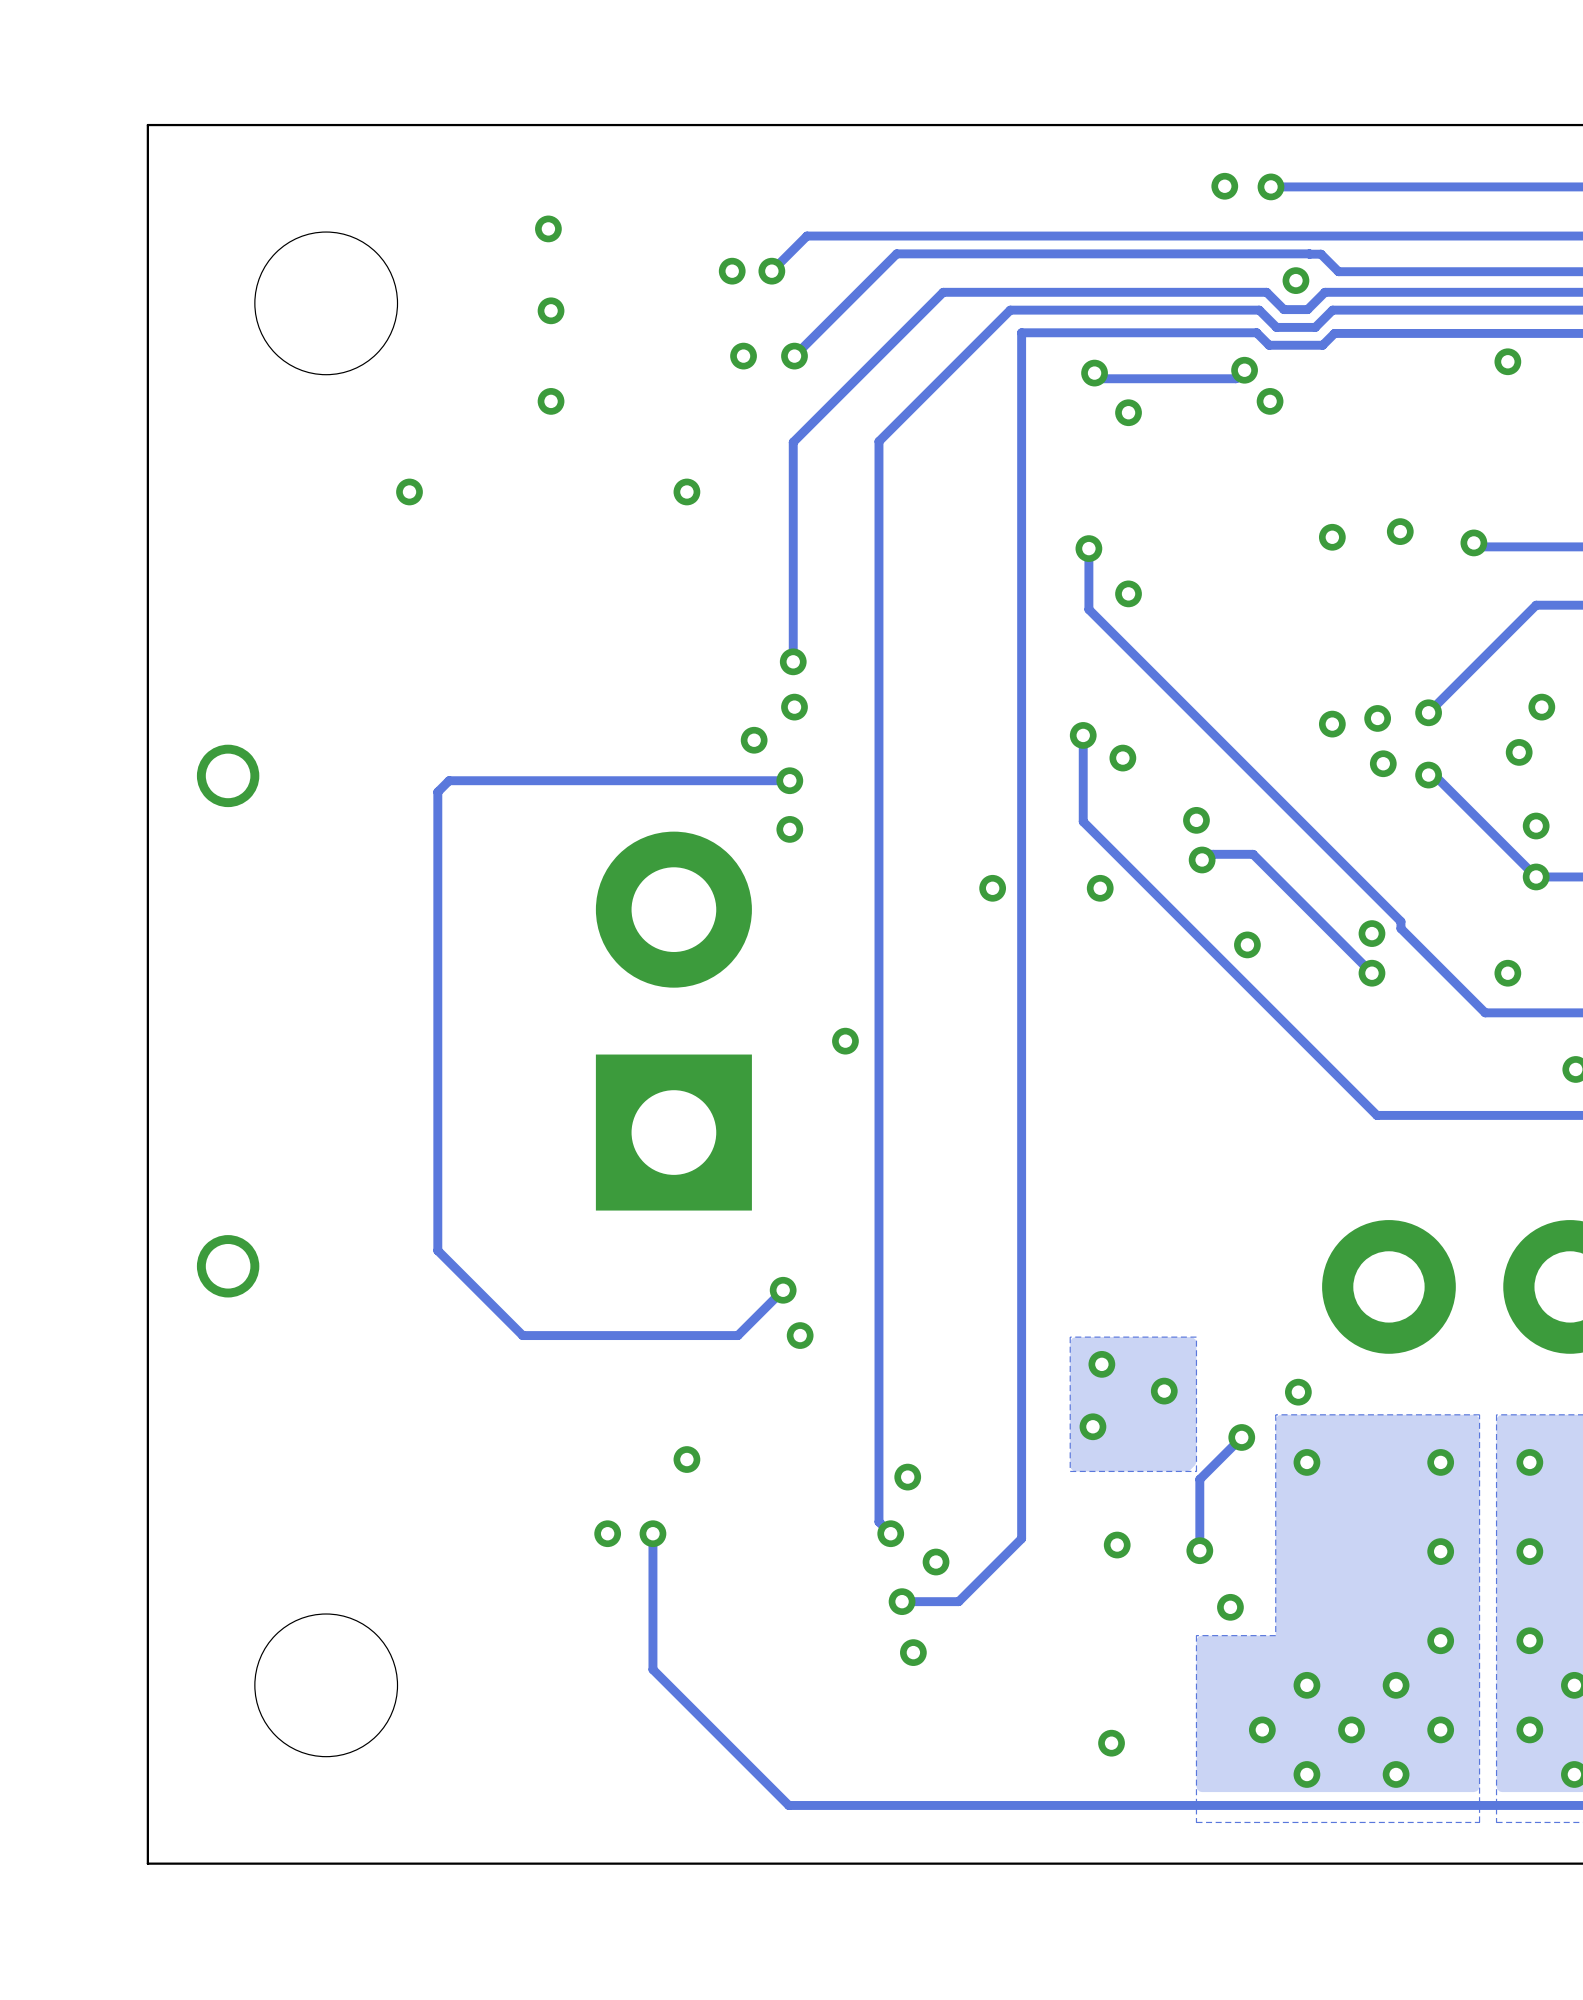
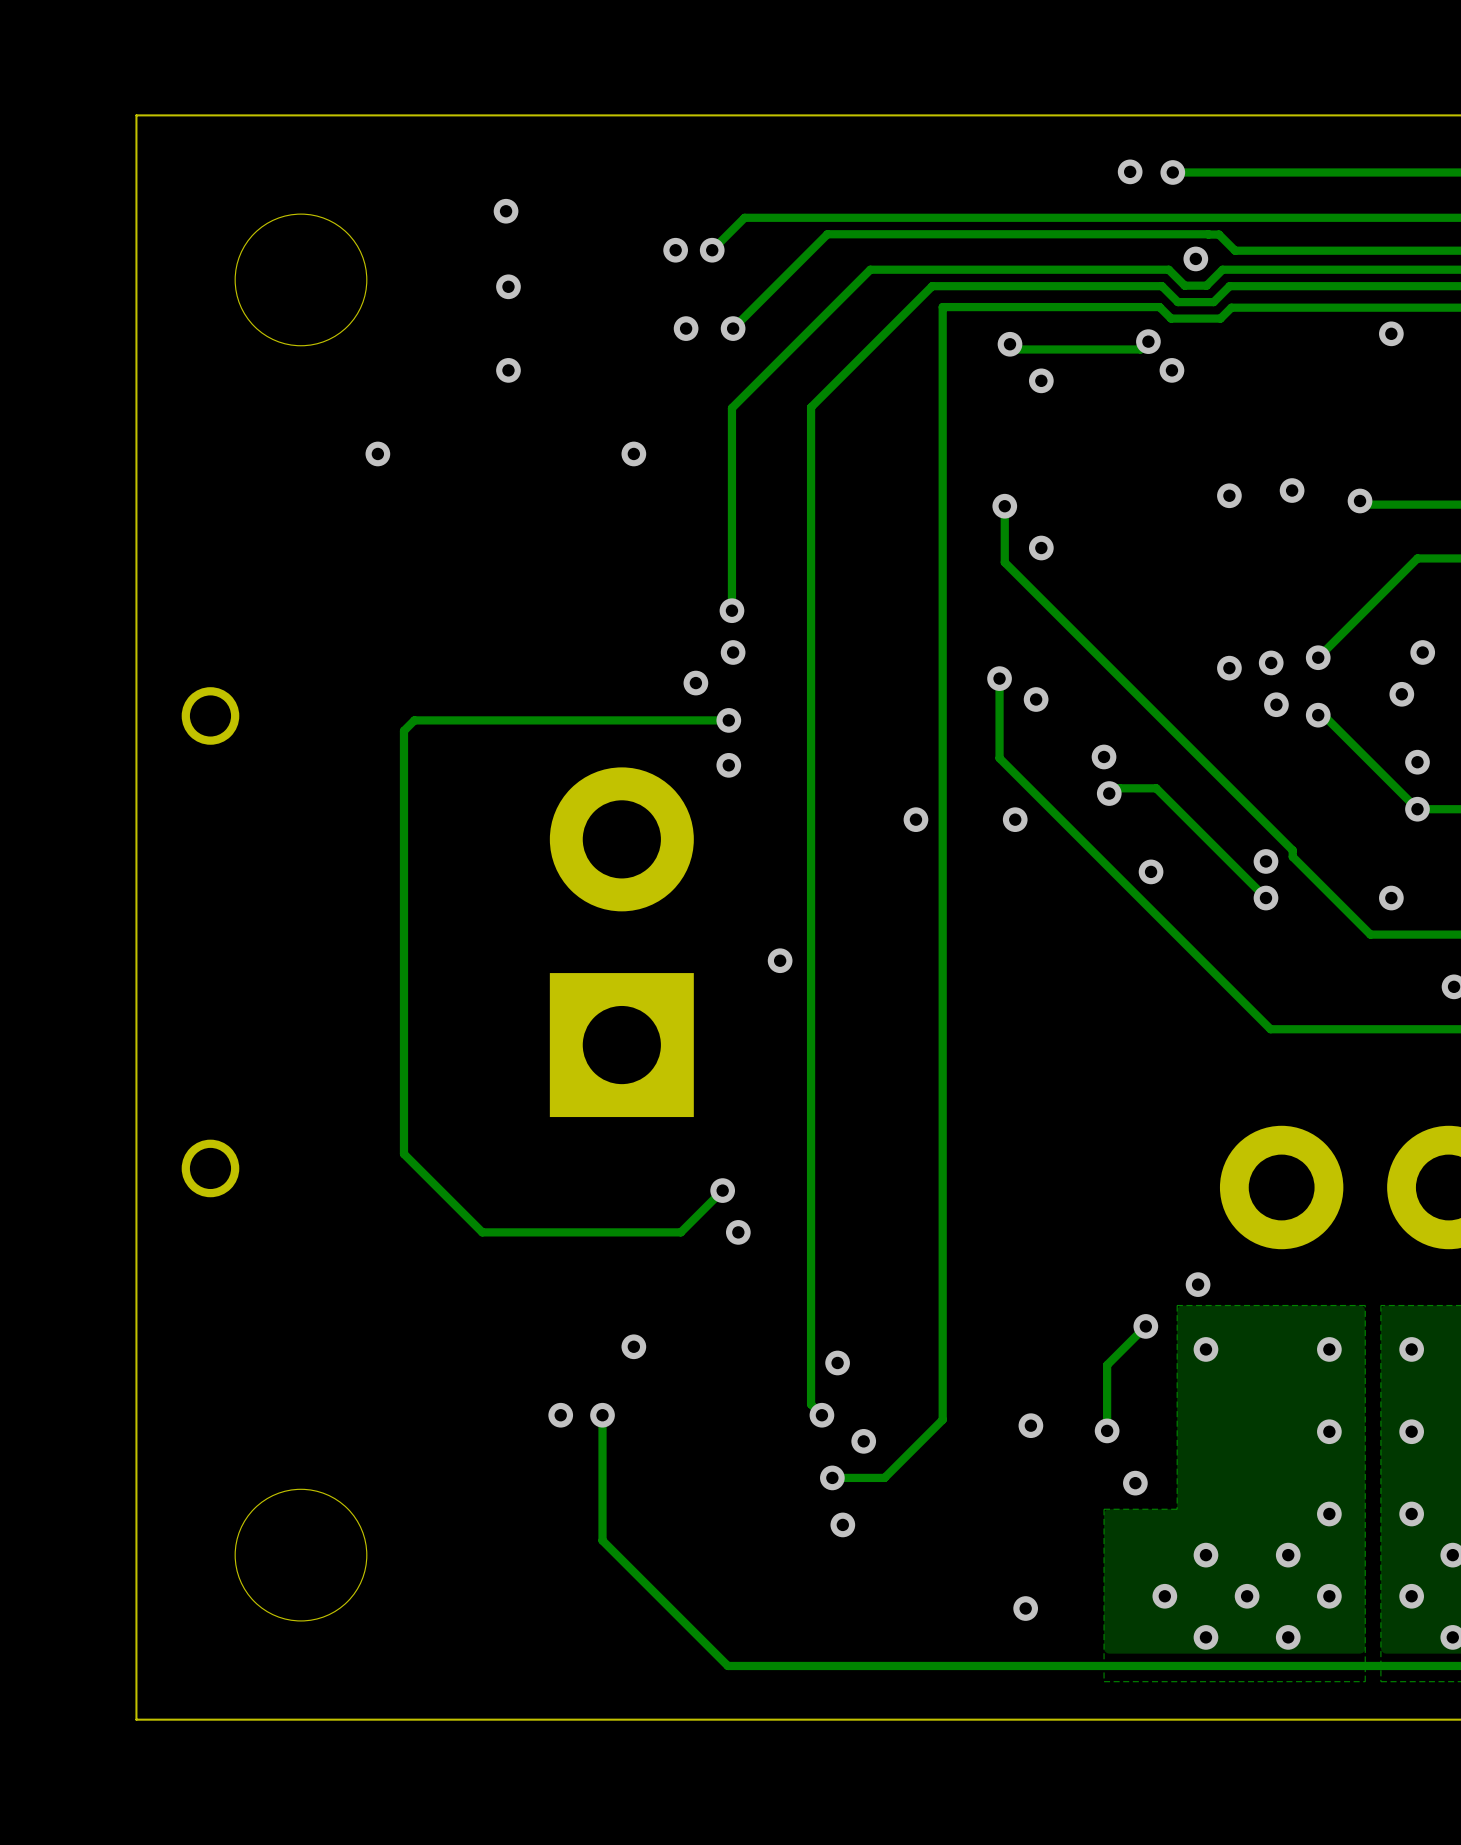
zone outline: (1196, 1337) (1070, 1337) (1070, 1471) (1196, 1471) (1196, 1337) -> none
via: (1101, 1364) -> none
via: (1164, 1391) -> none
via: (1092, 1426) -> none

